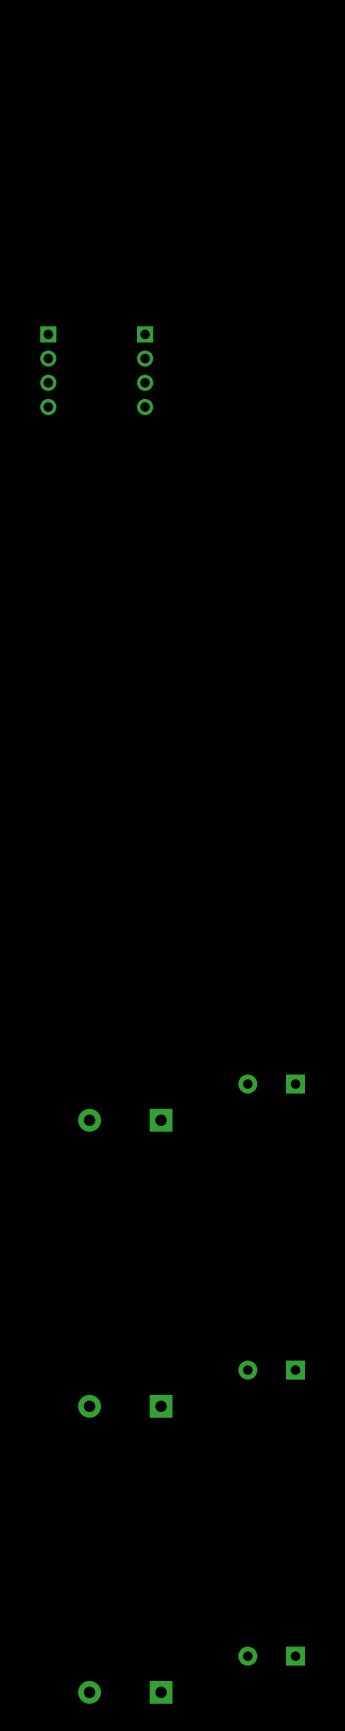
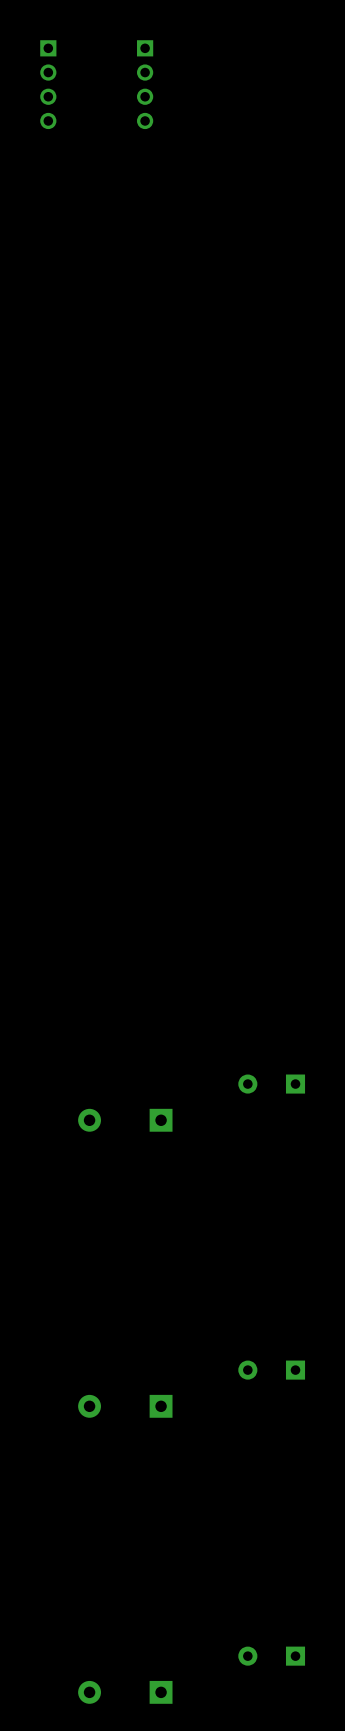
part: none -> (48, 84)
part: none -> (145, 84)
part: (48, 370) -> none
part: (145, 370) -> none

